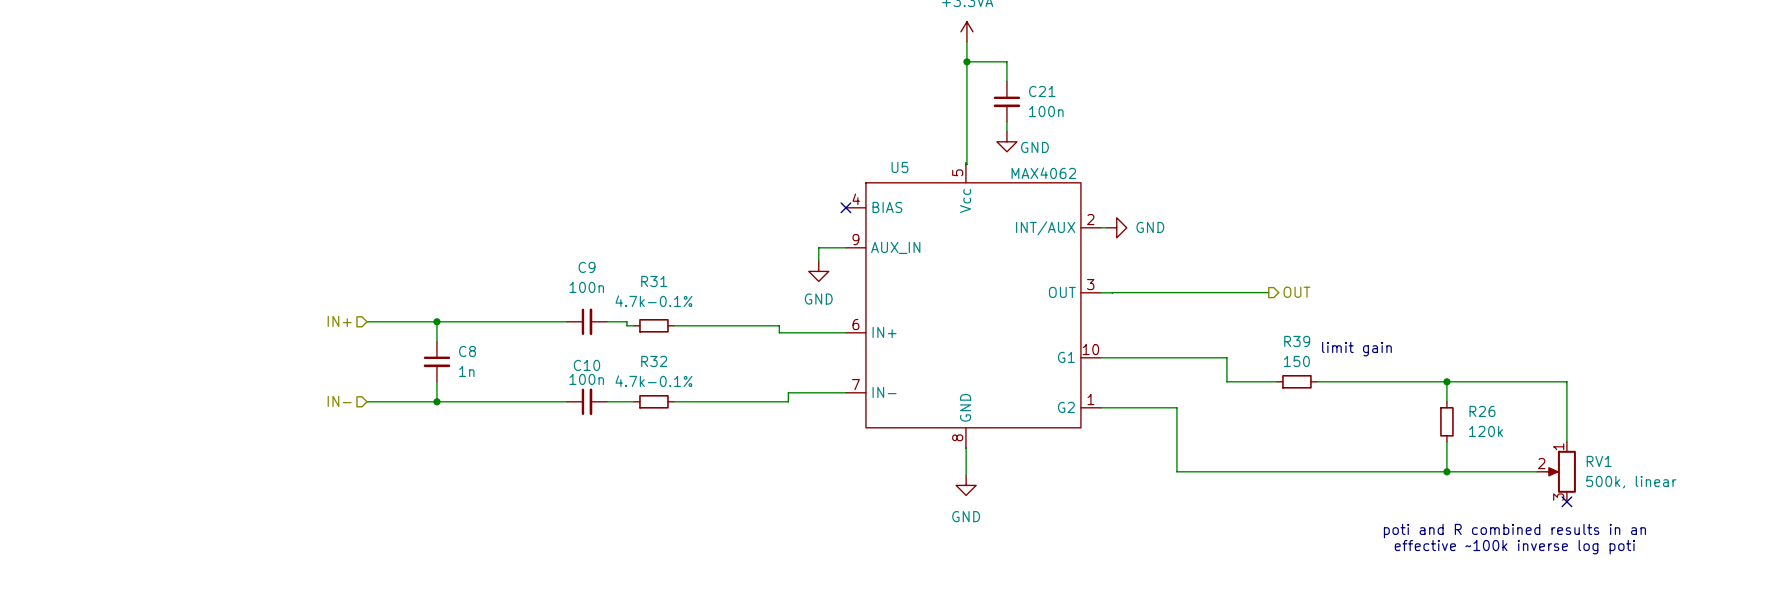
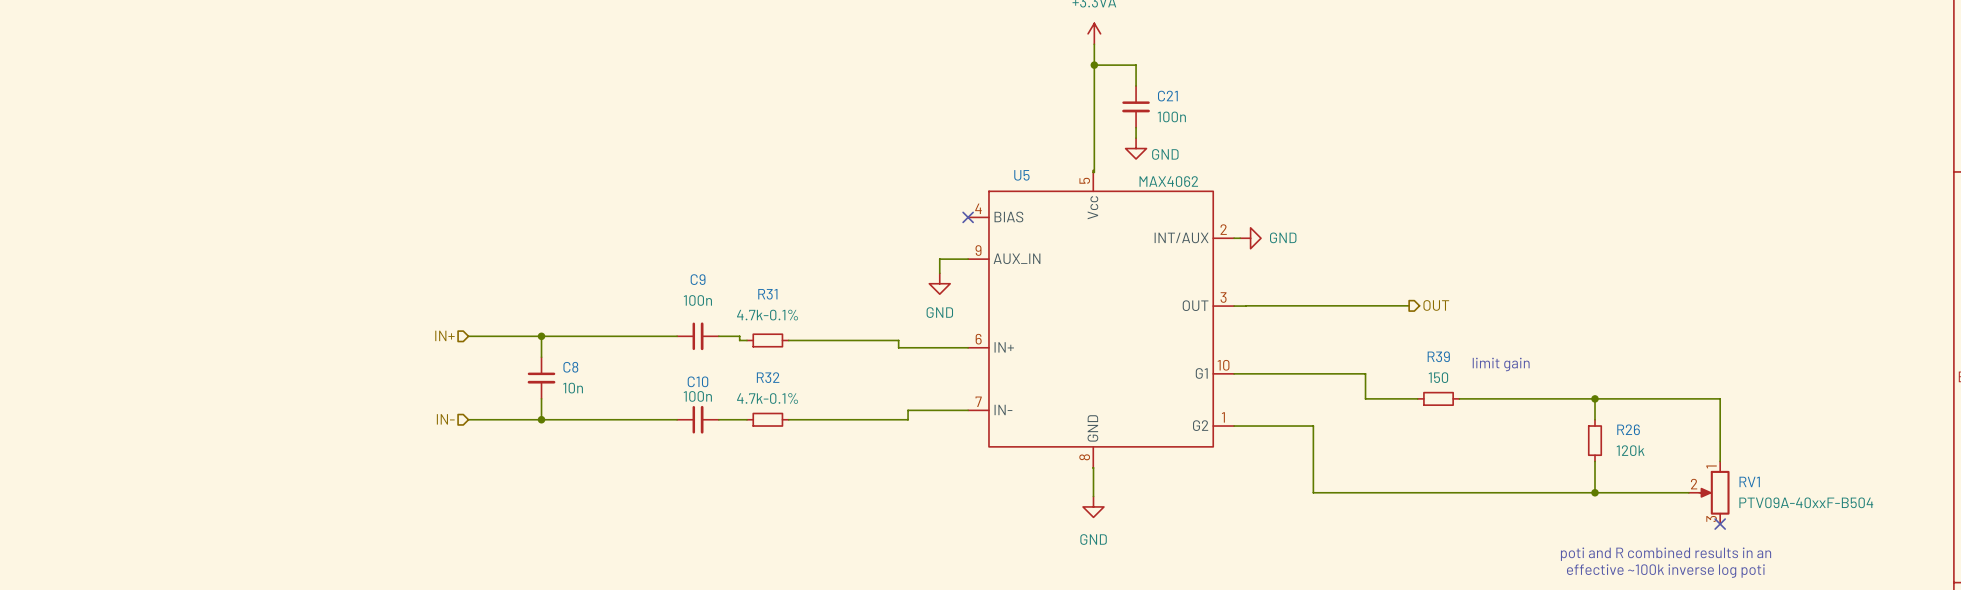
C8 value: 1n (466, 371) -> 10n (573, 388)
RV1 value: 500k, linear (1631, 482) -> PTV09A-40xxF-B504 (1806, 502)

